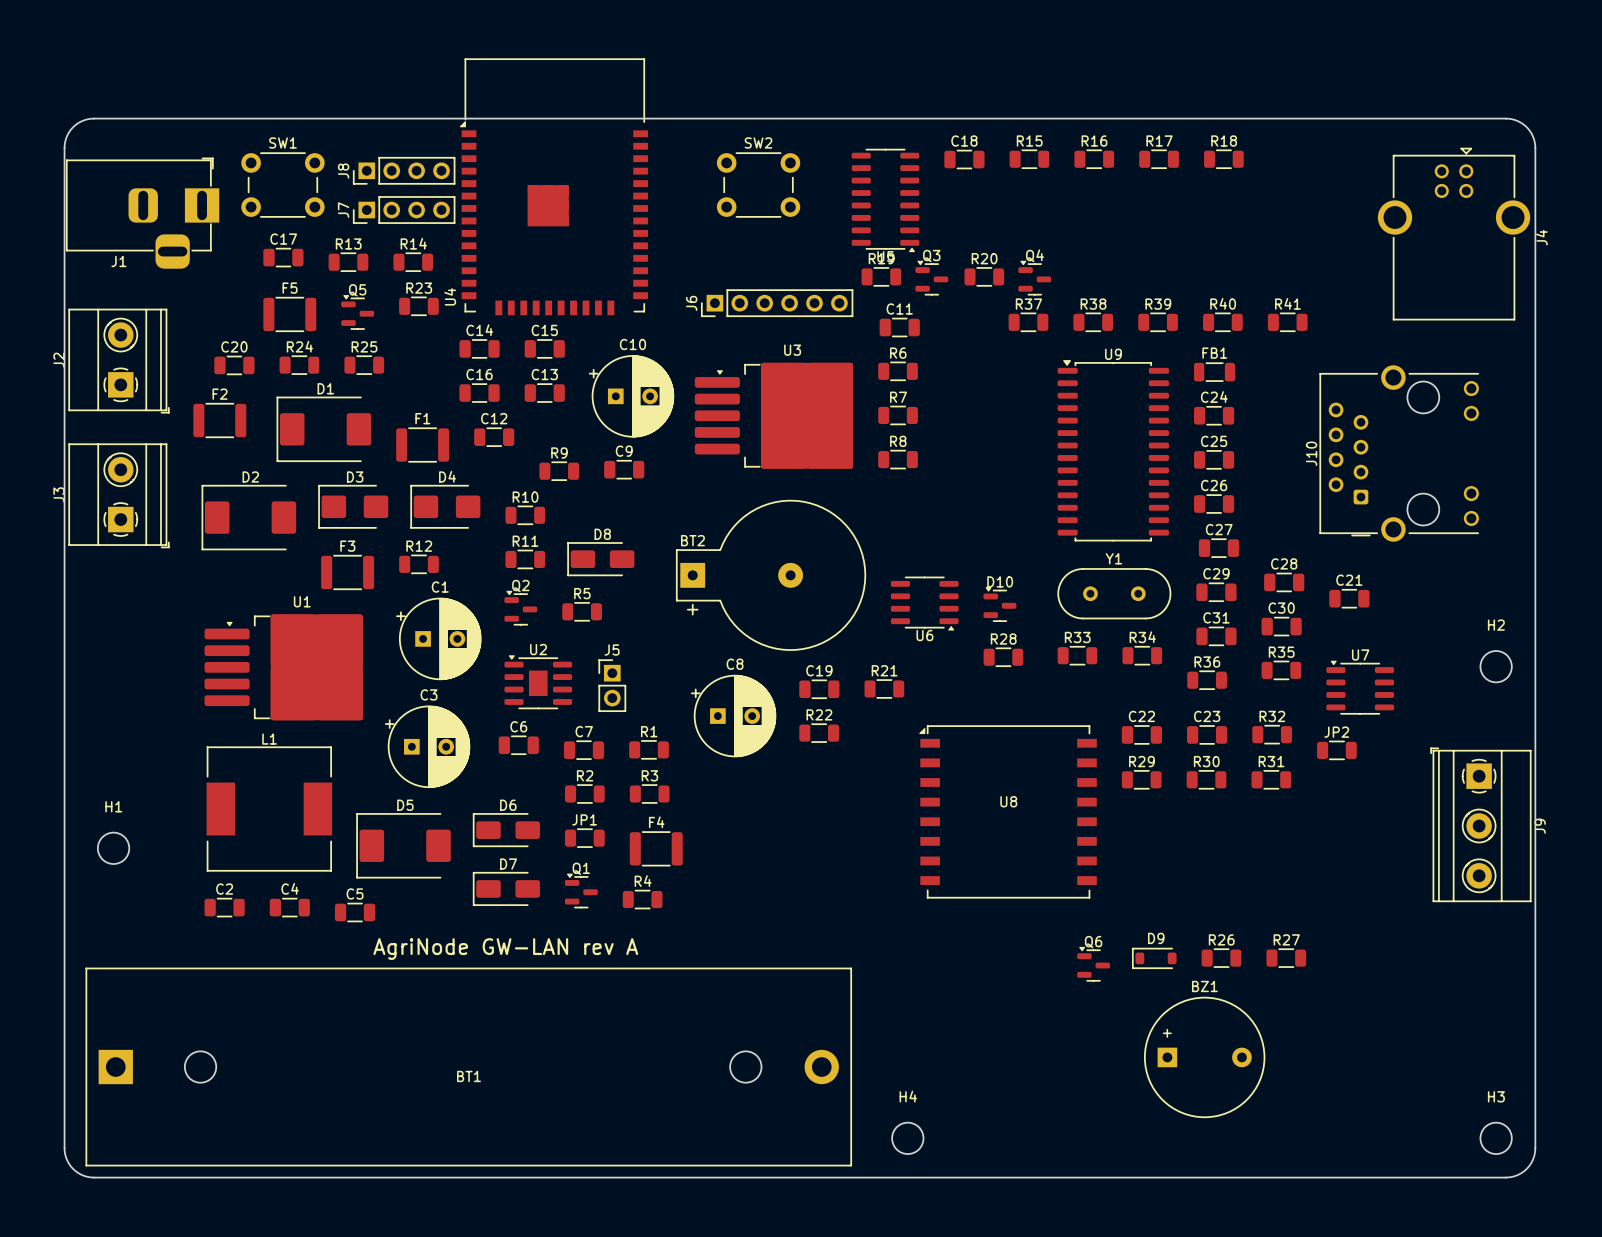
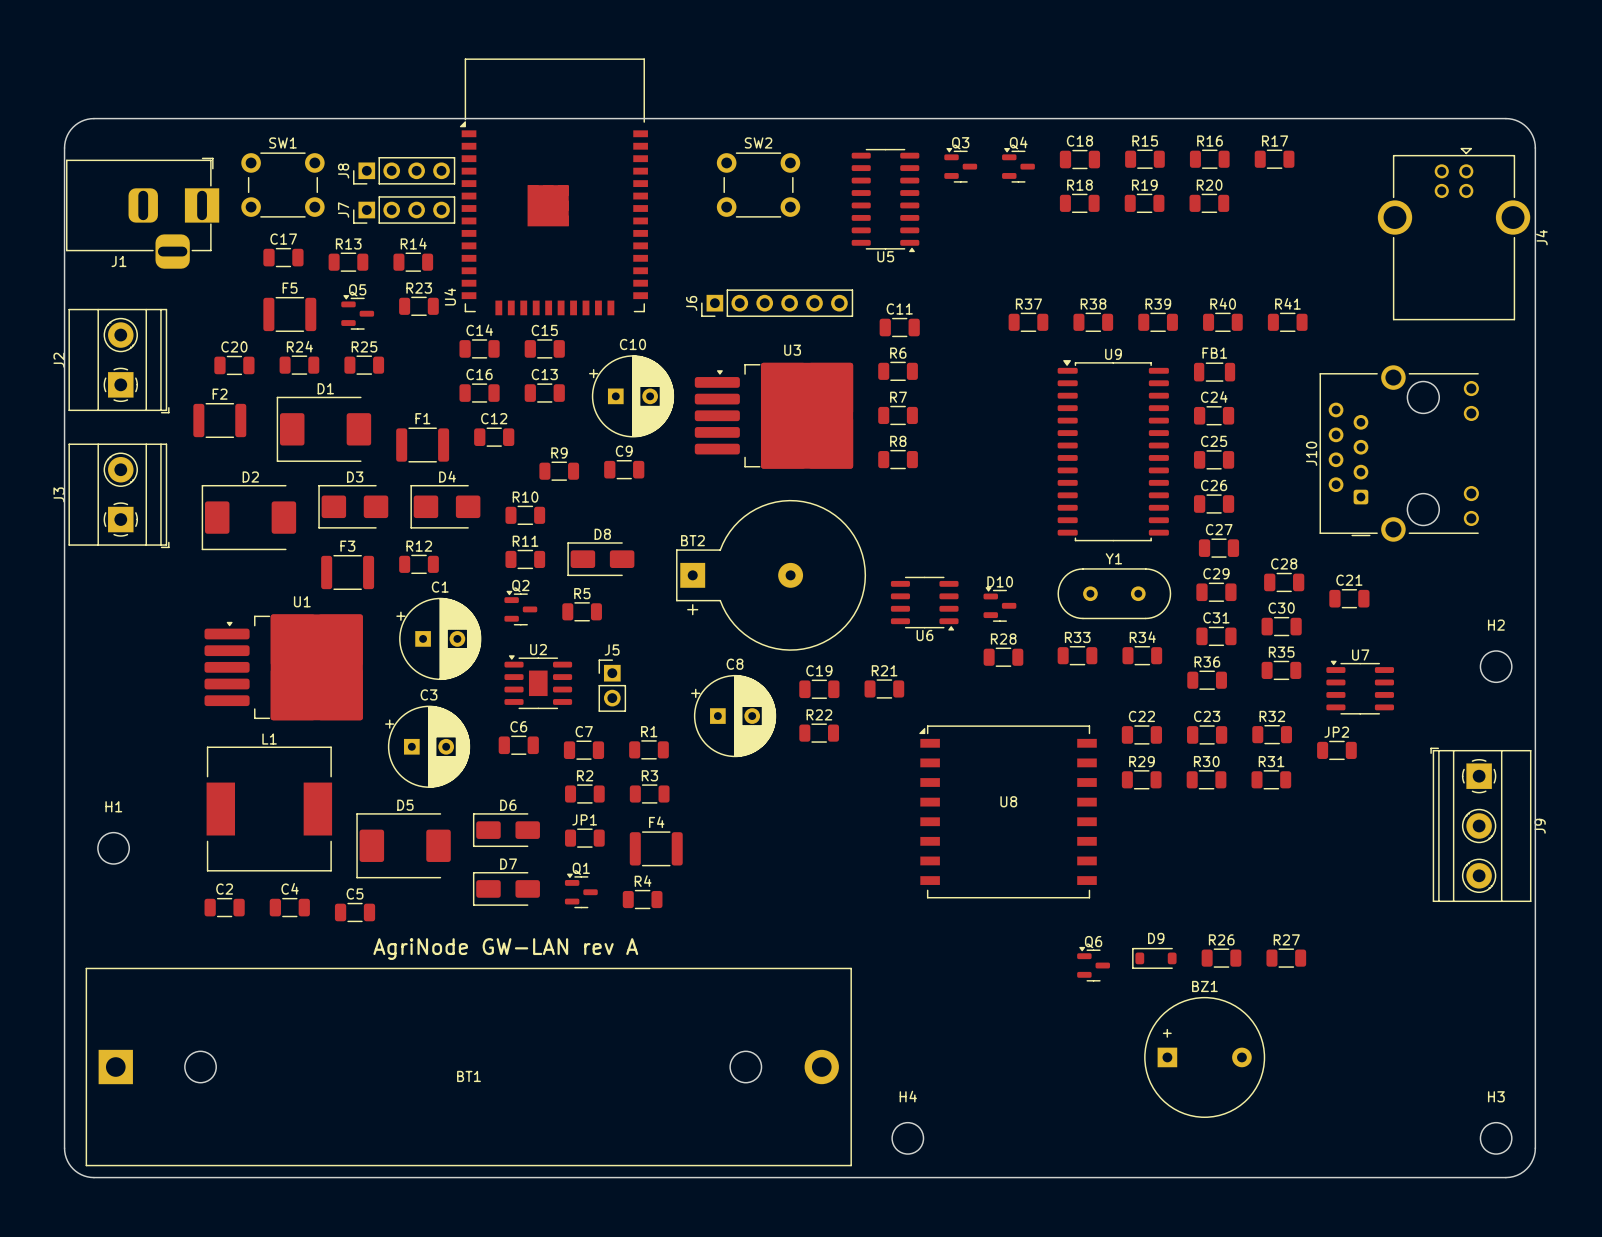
C18 position: (964, 159) -> (1079, 159)
R15 position: (1029, 159) -> (1144, 159)
R16 position: (1094, 159) -> (1209, 159)
R17 position: (1159, 159) -> (1274, 159)
R18 position: (1223, 159) -> (1079, 203)
R19 position: (881, 276) -> (1144, 203)
R20 position: (984, 276) -> (1209, 203)
Q3 position: (931, 278) -> (960, 165)
Q4 position: (1034, 278) -> (1018, 165)

